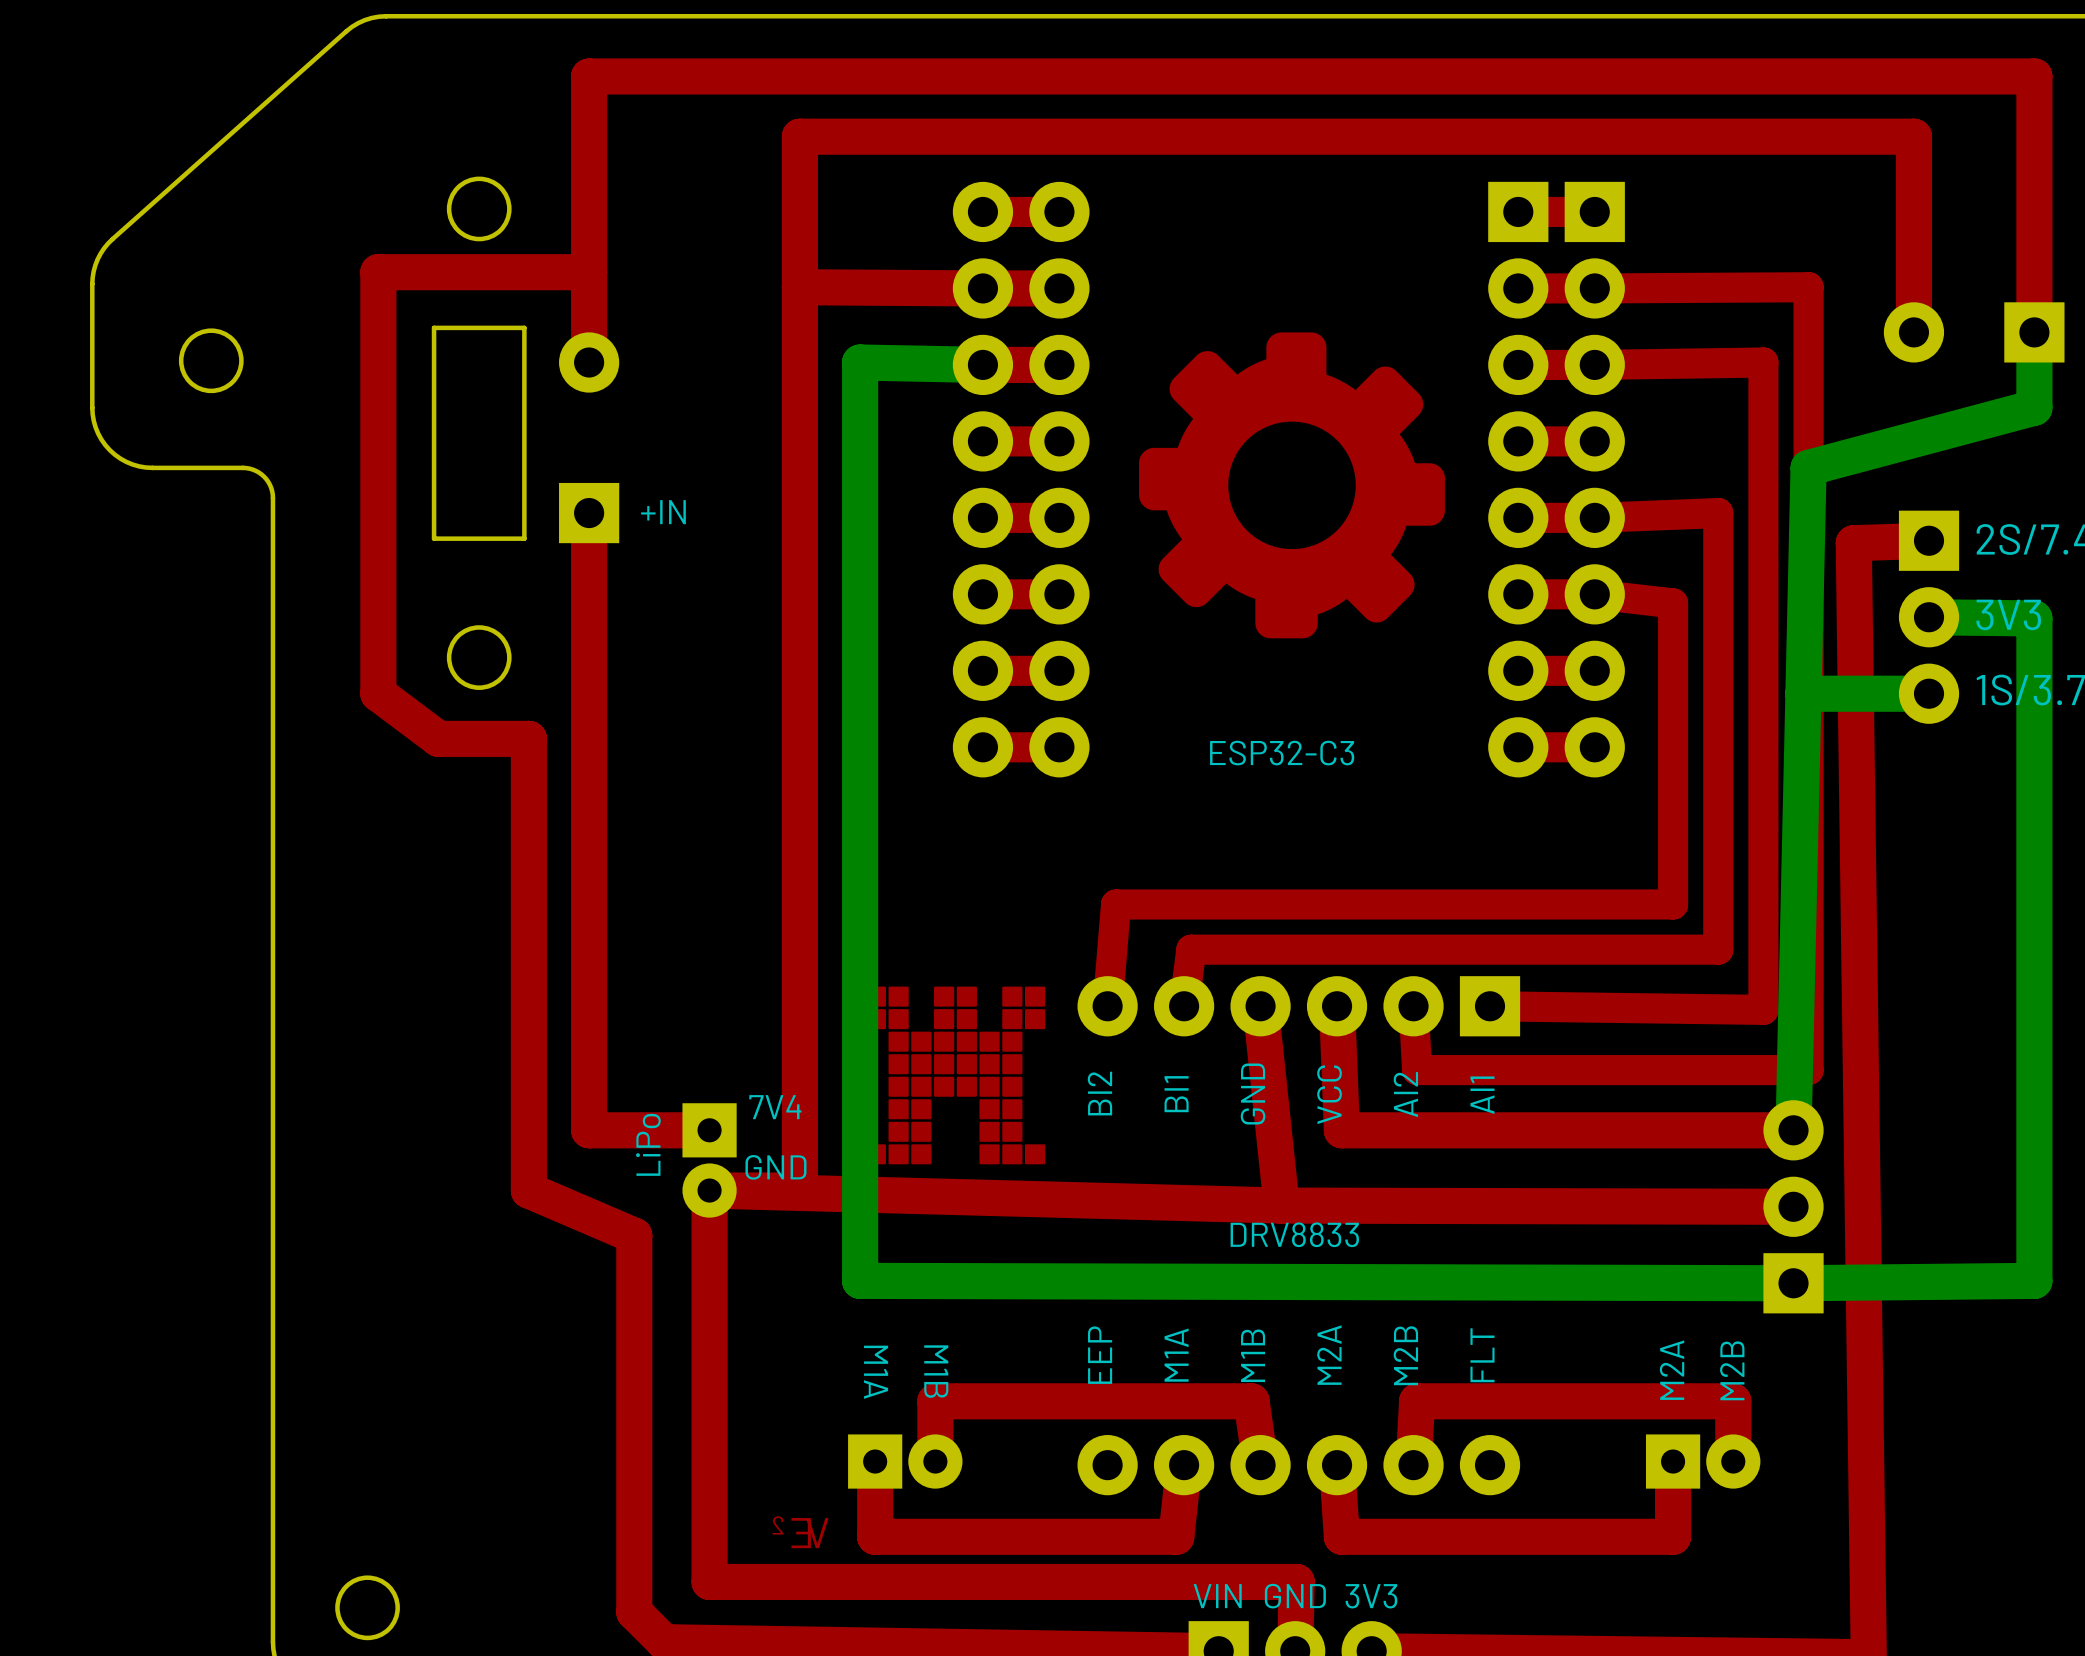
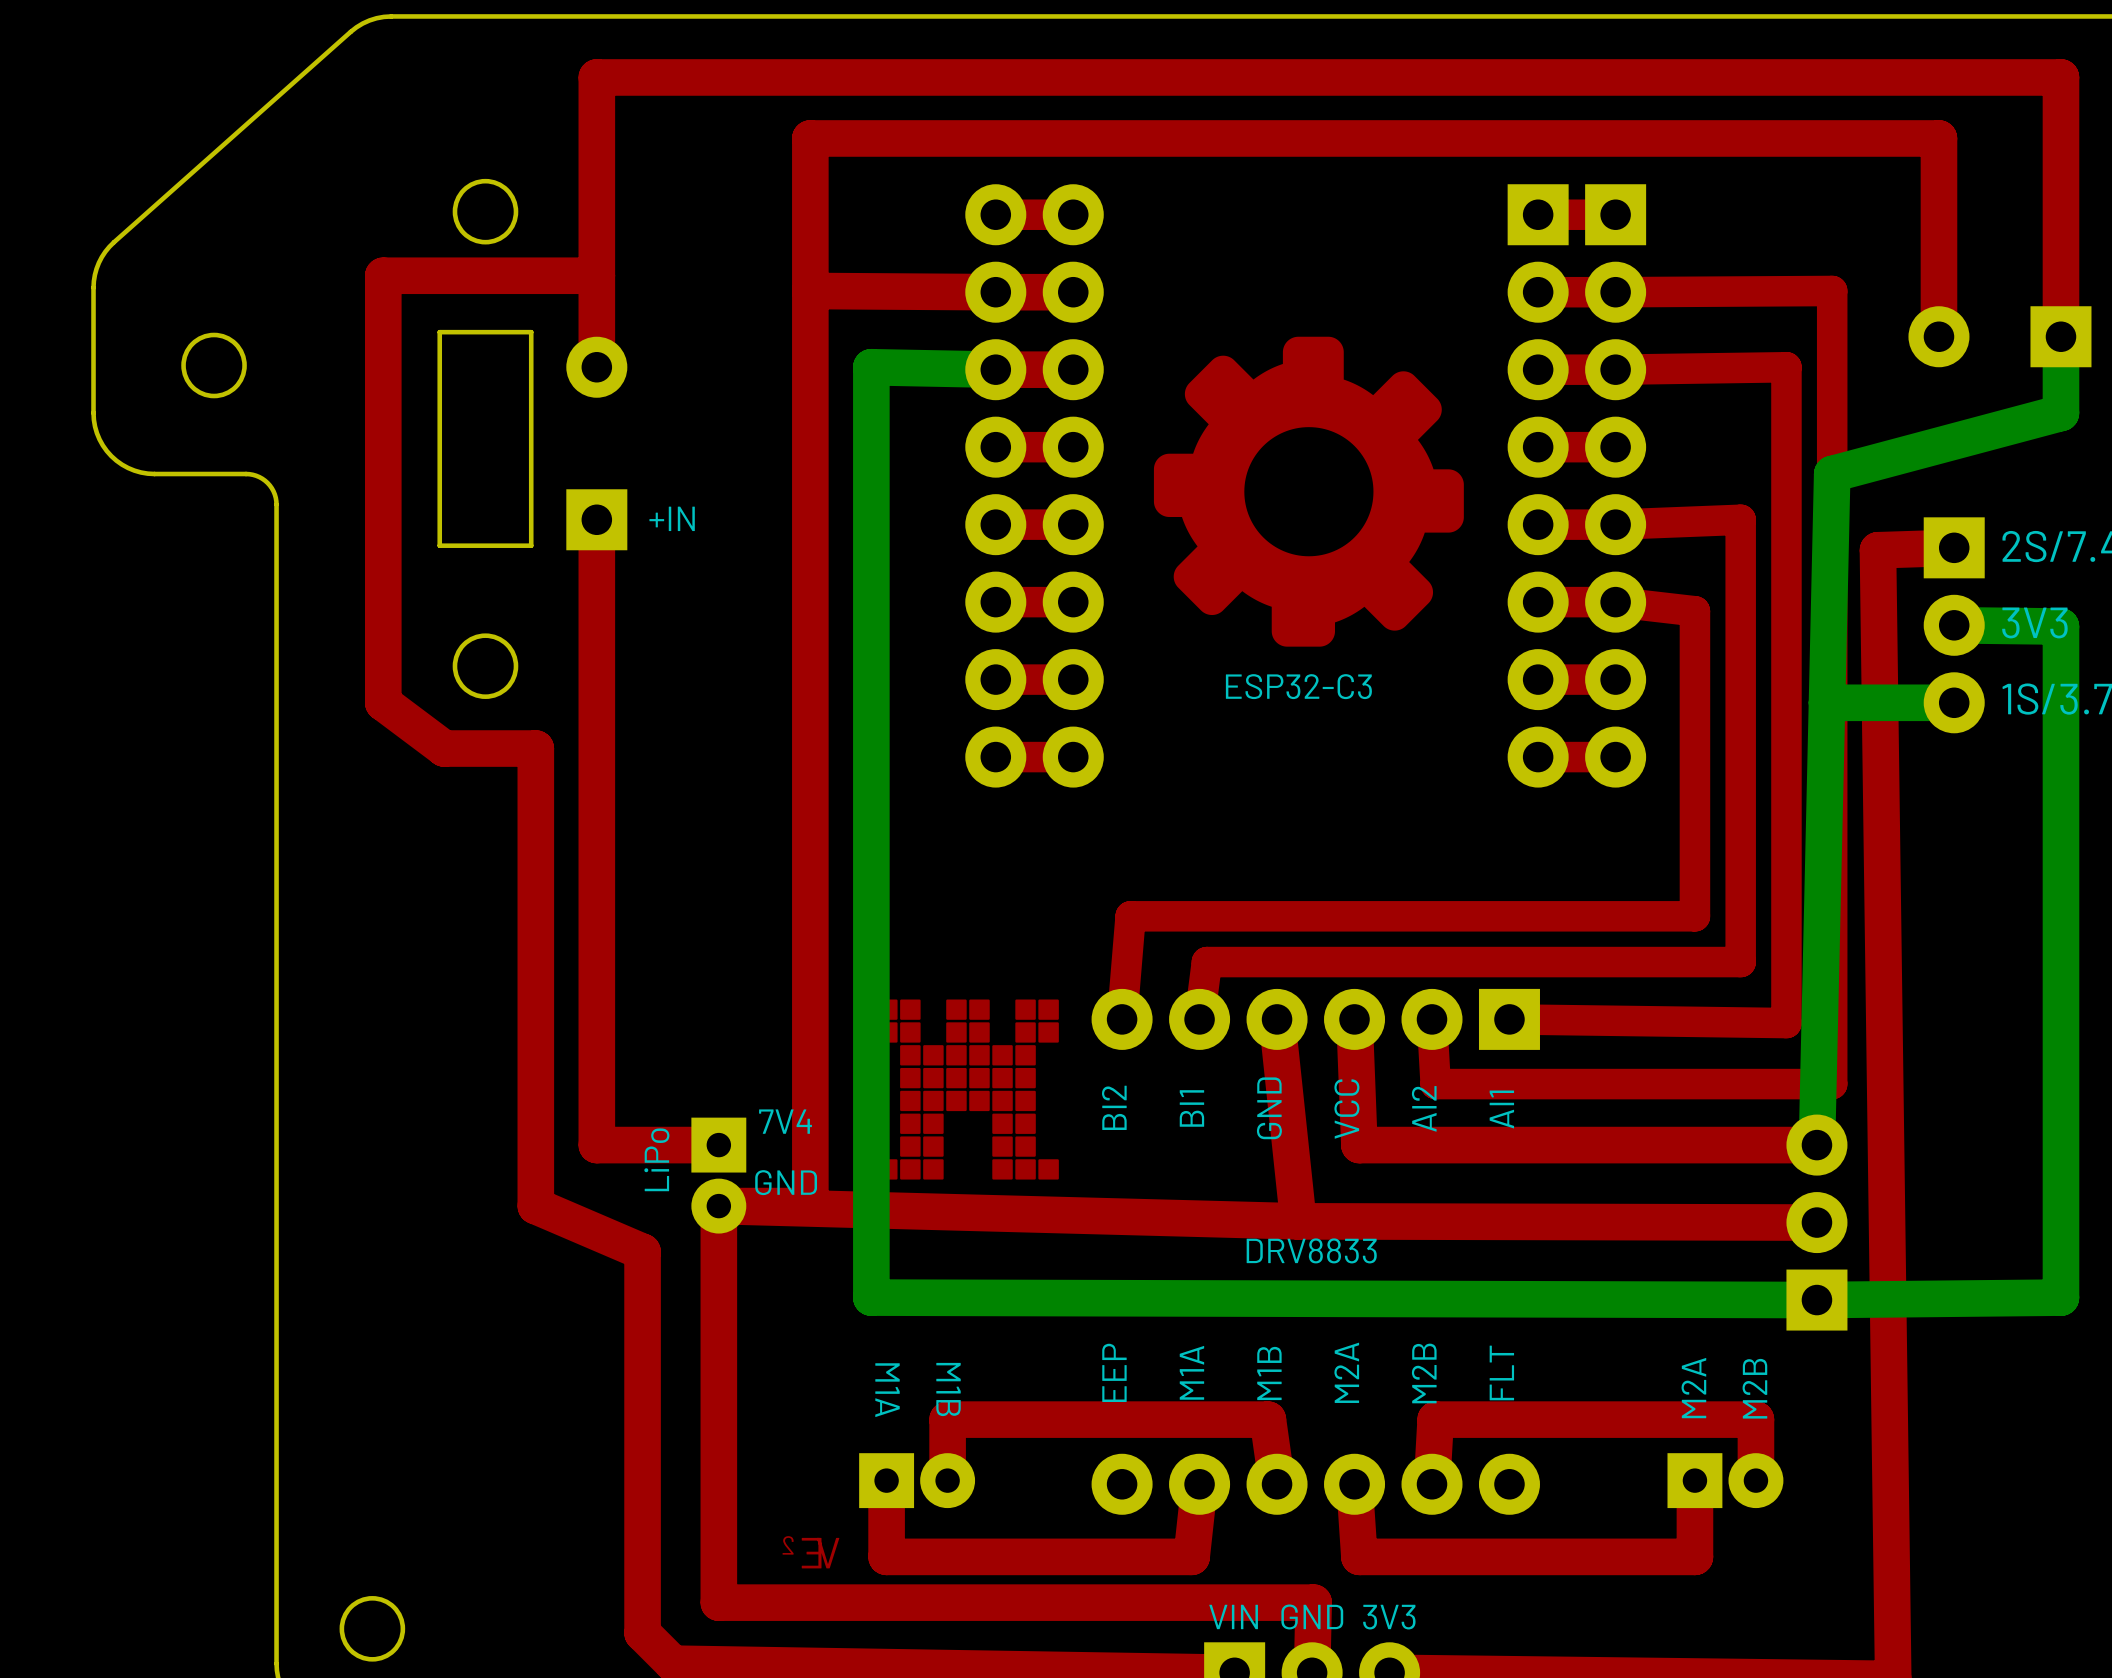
text position: ESP32-C3 (1282, 753) -> ESP32-C3 (1298, 686)

